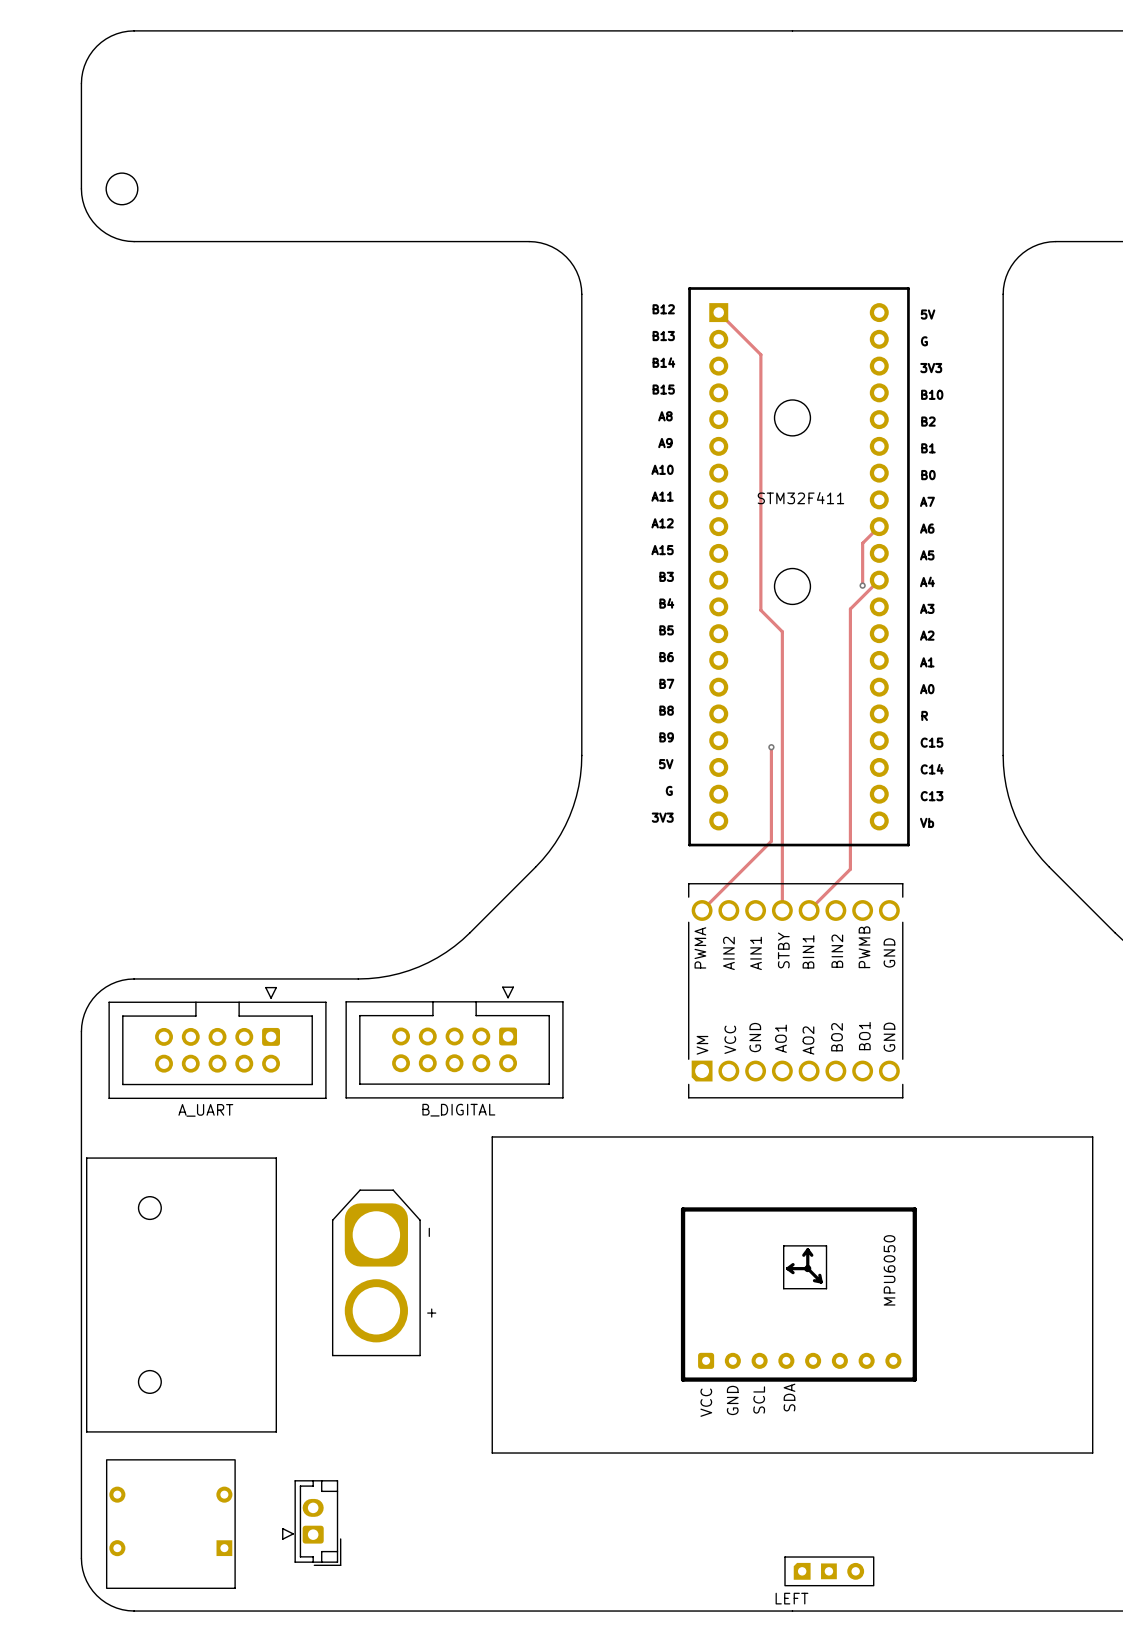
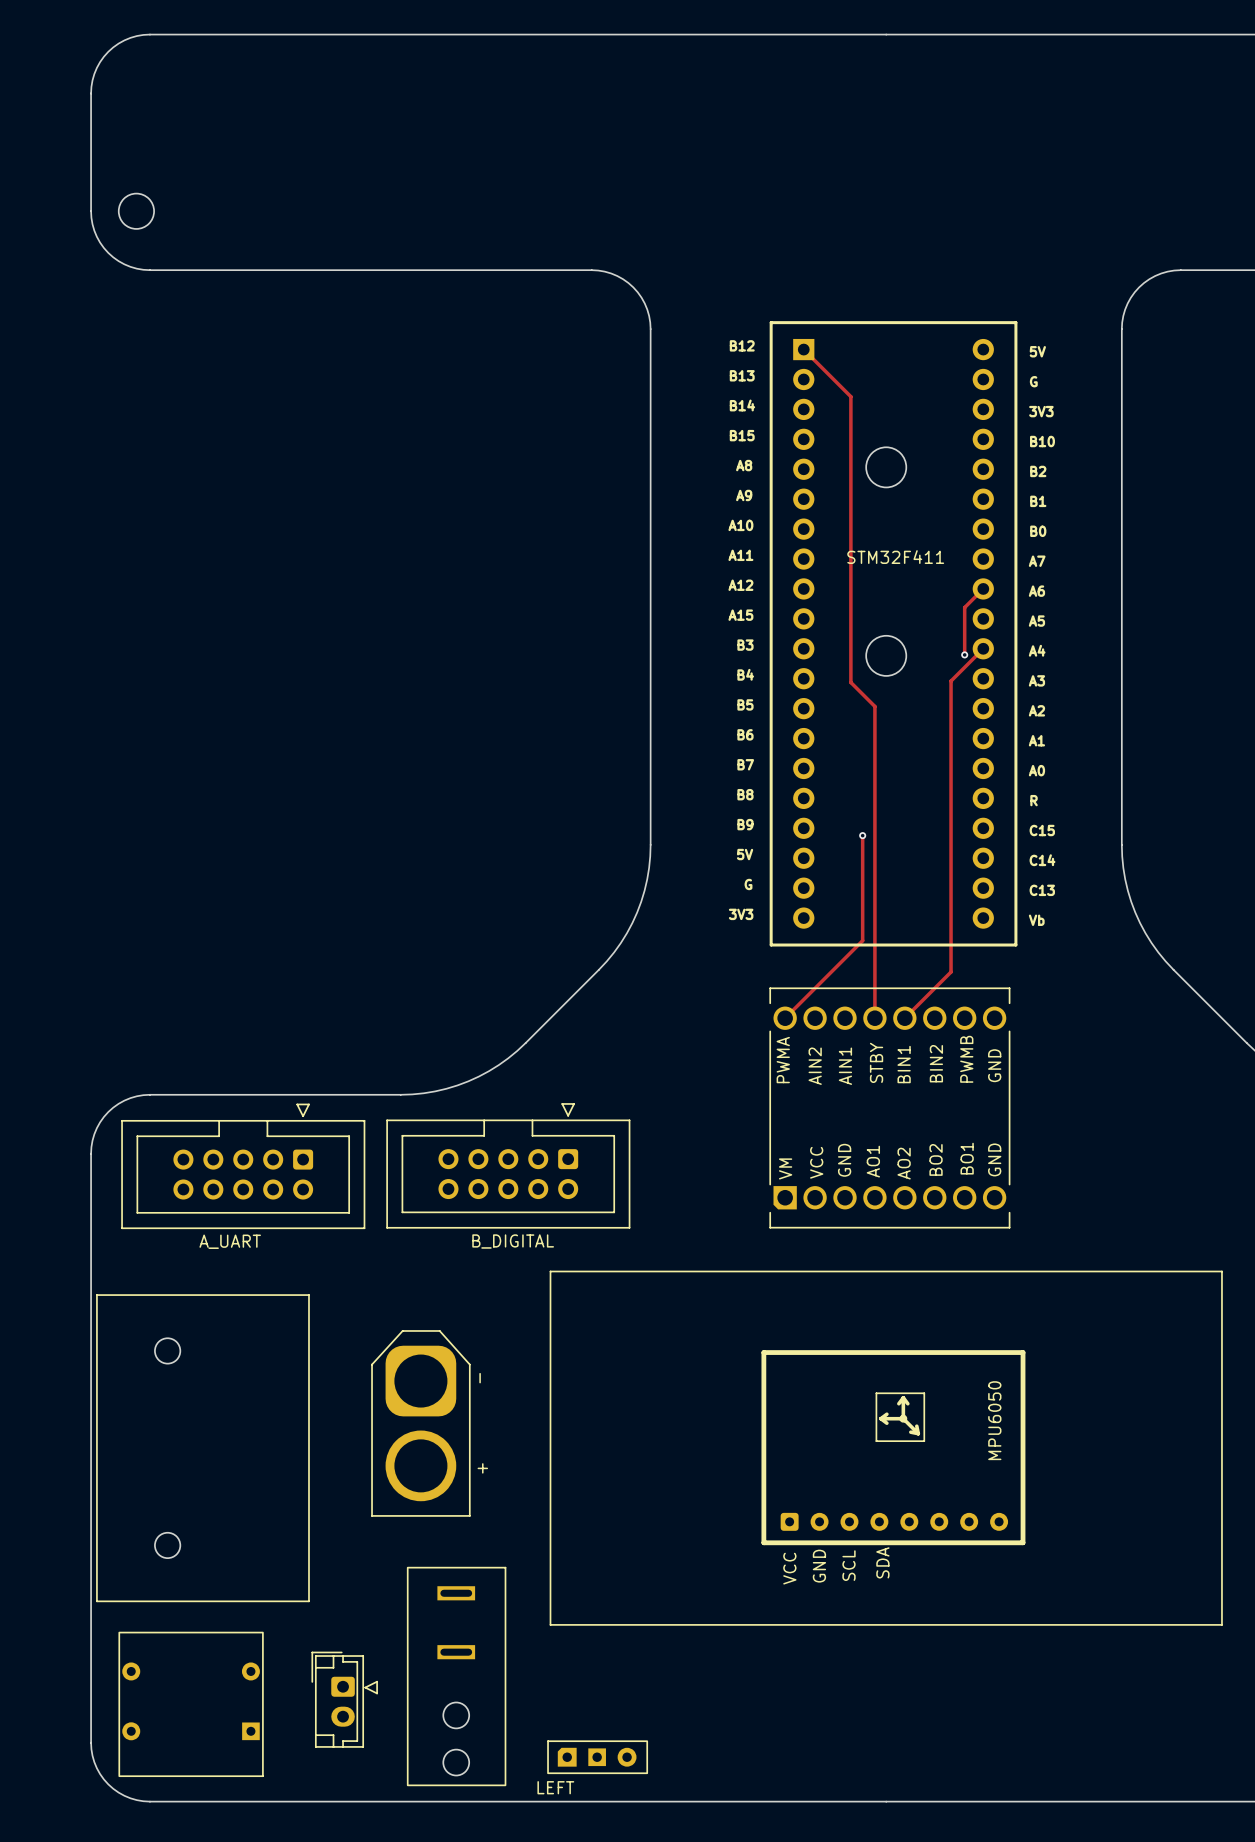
part: none -> (456, 1676)
part rotation: 0° (311, 1523) -> 180° (344, 1699)
part: none -> (597, 1757)
part: (829, 1571) -> none

